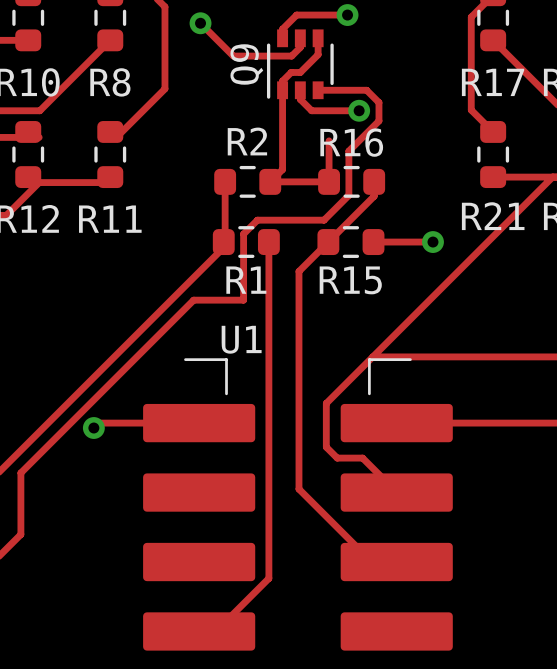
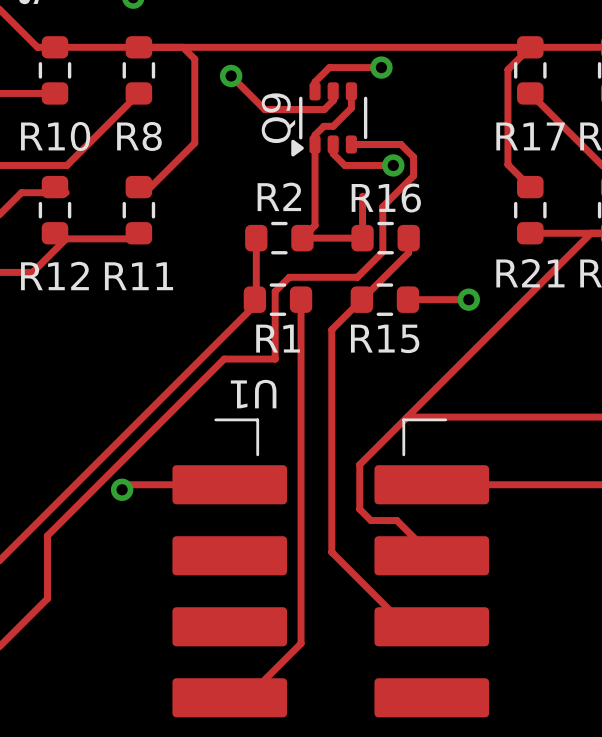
Q9 footprint: [266, 29, 334, 100] -> [291, 82, 368, 157]
U1 name rotation: 0° (241, 339) -> 180° (253, 394)

